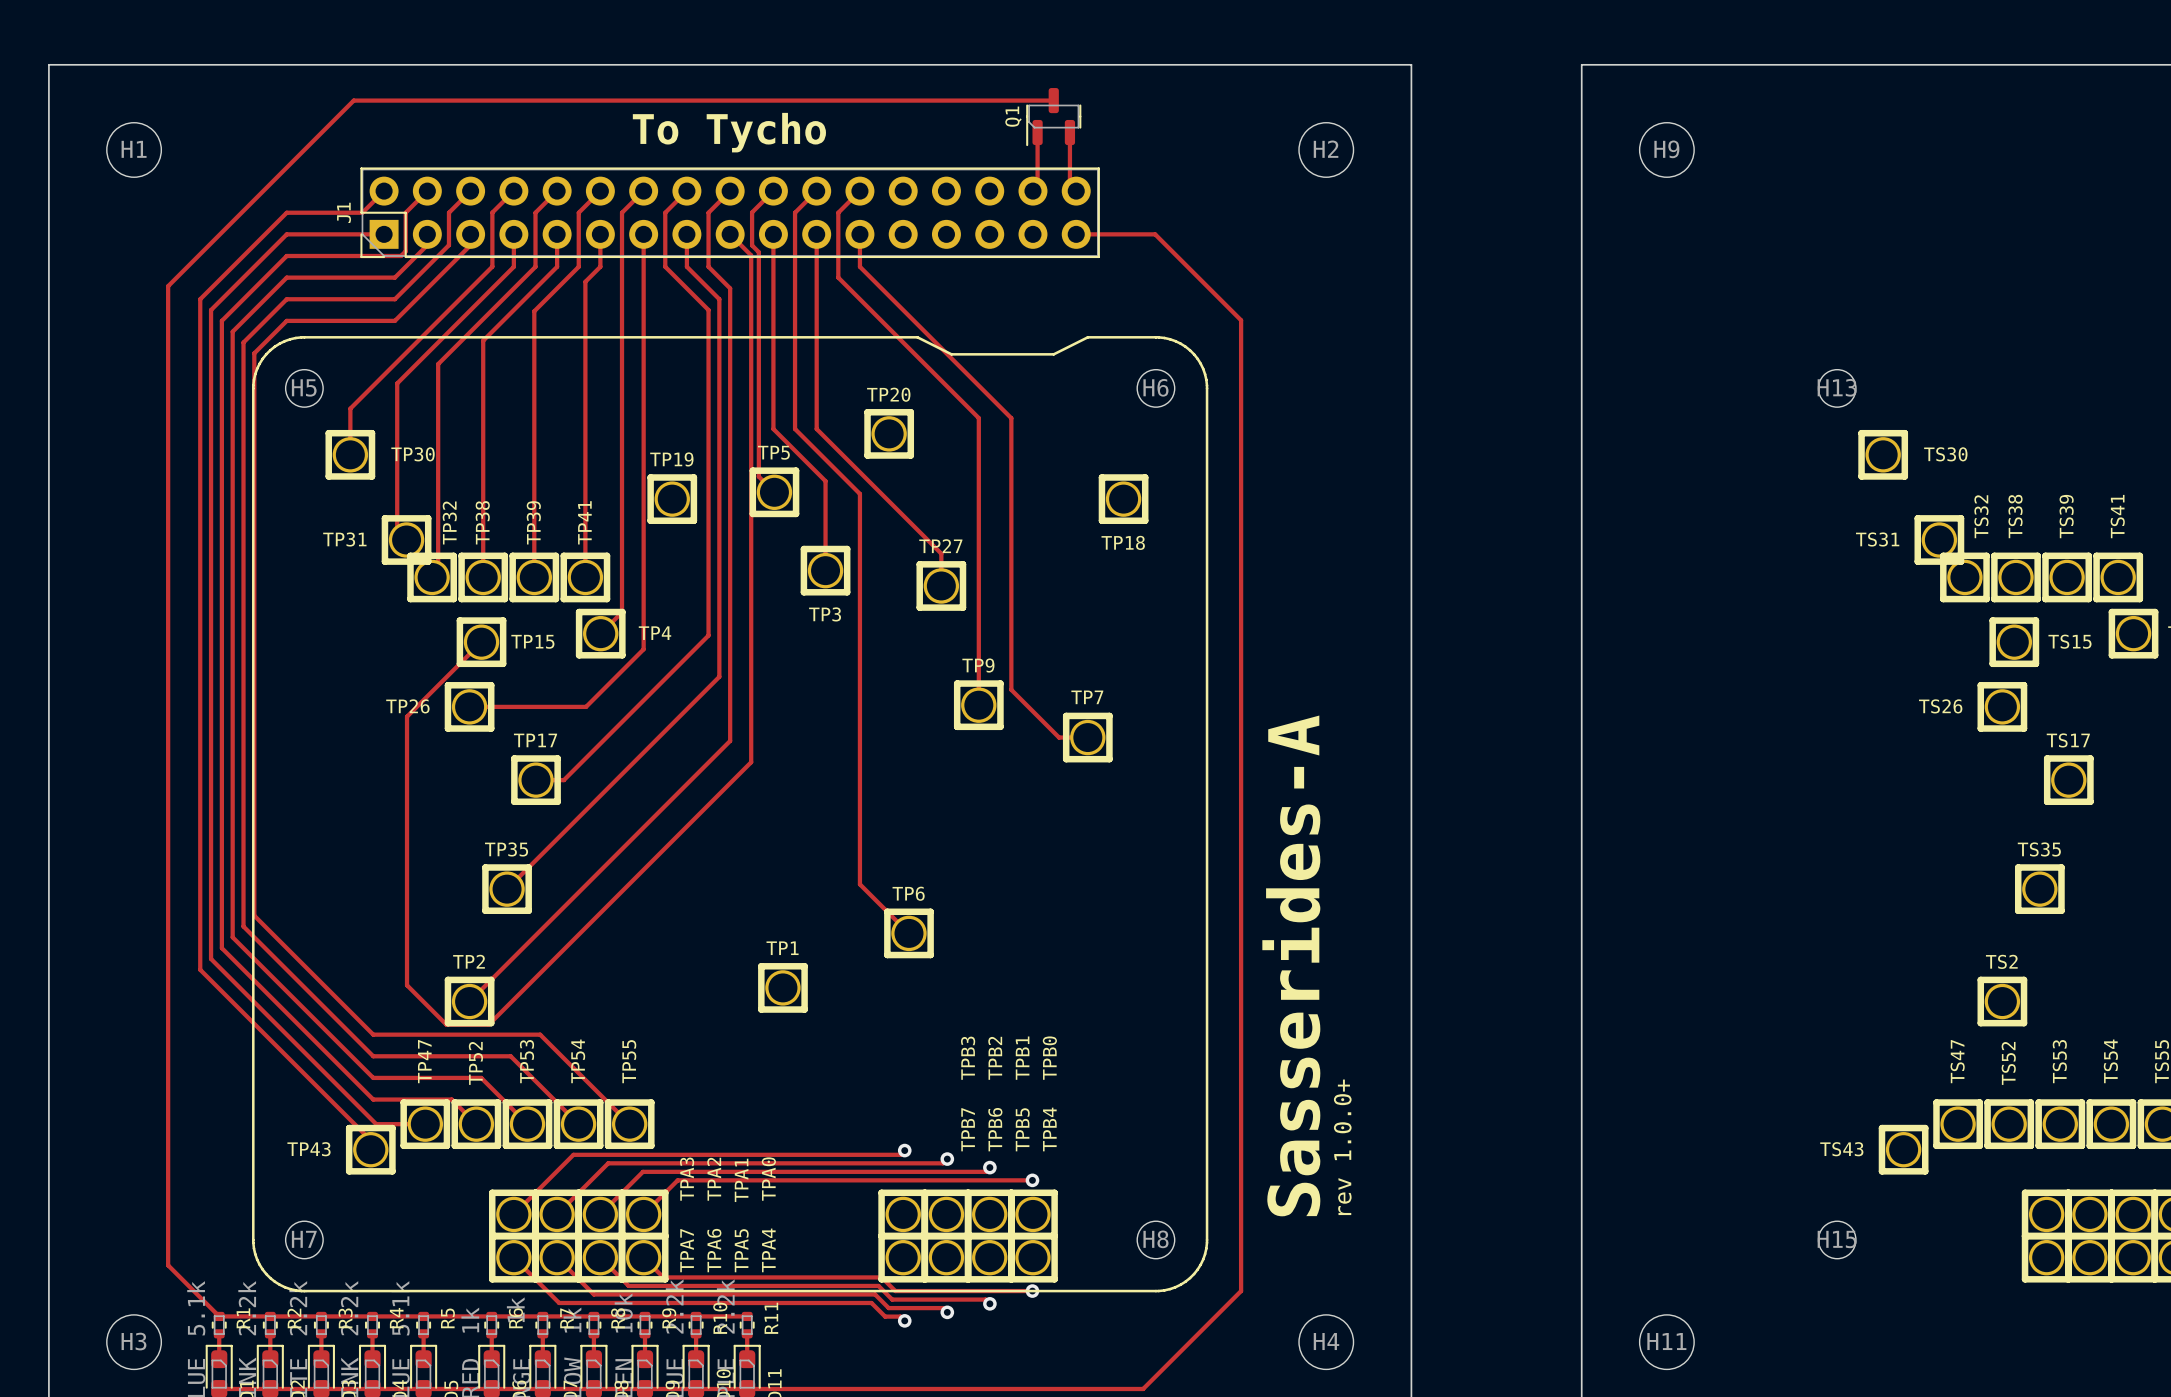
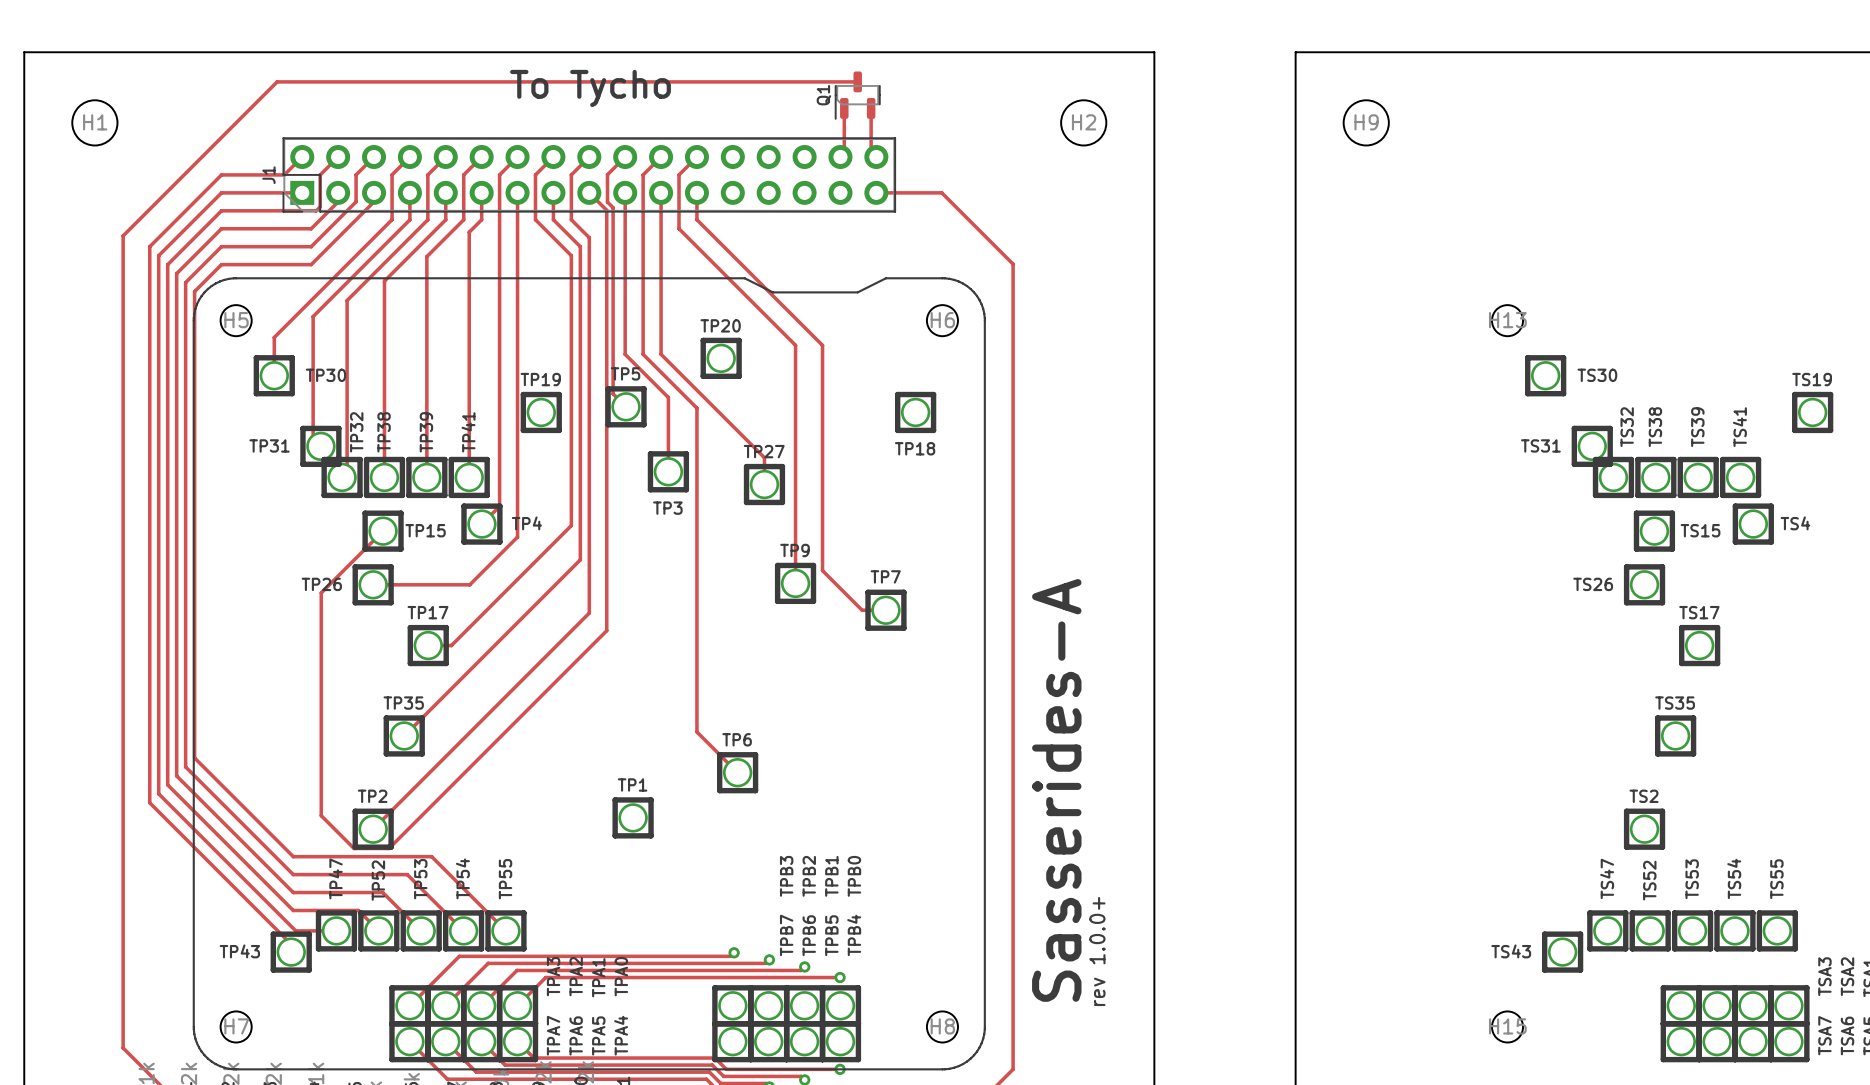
text position: To Tycho (729, 132) -> To Tycho (590, 88)

